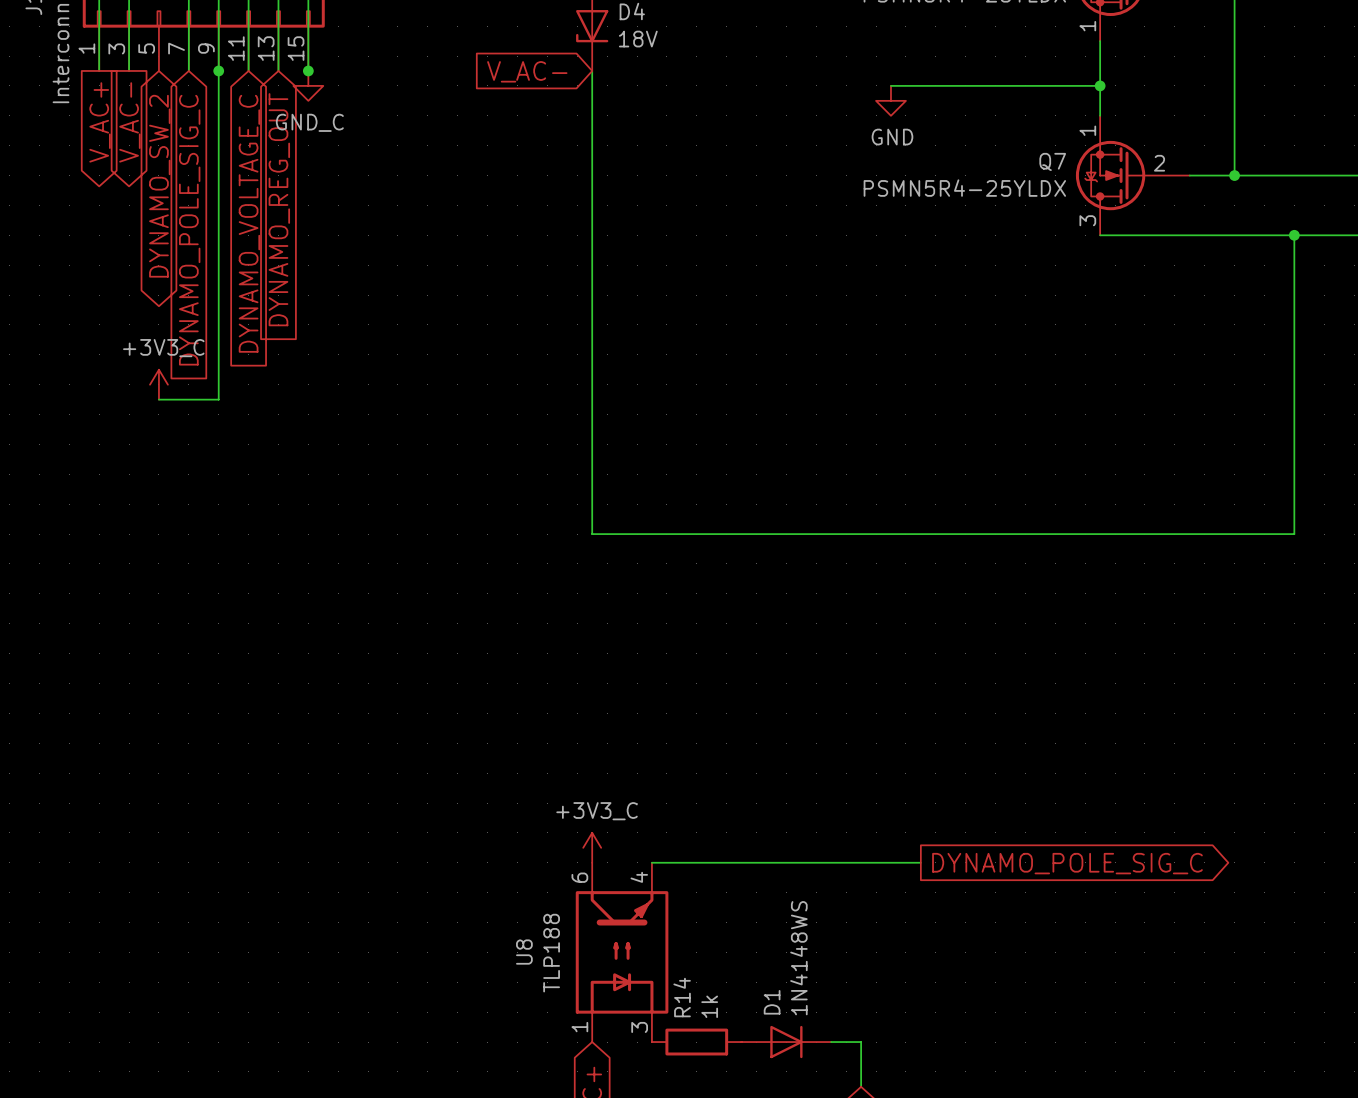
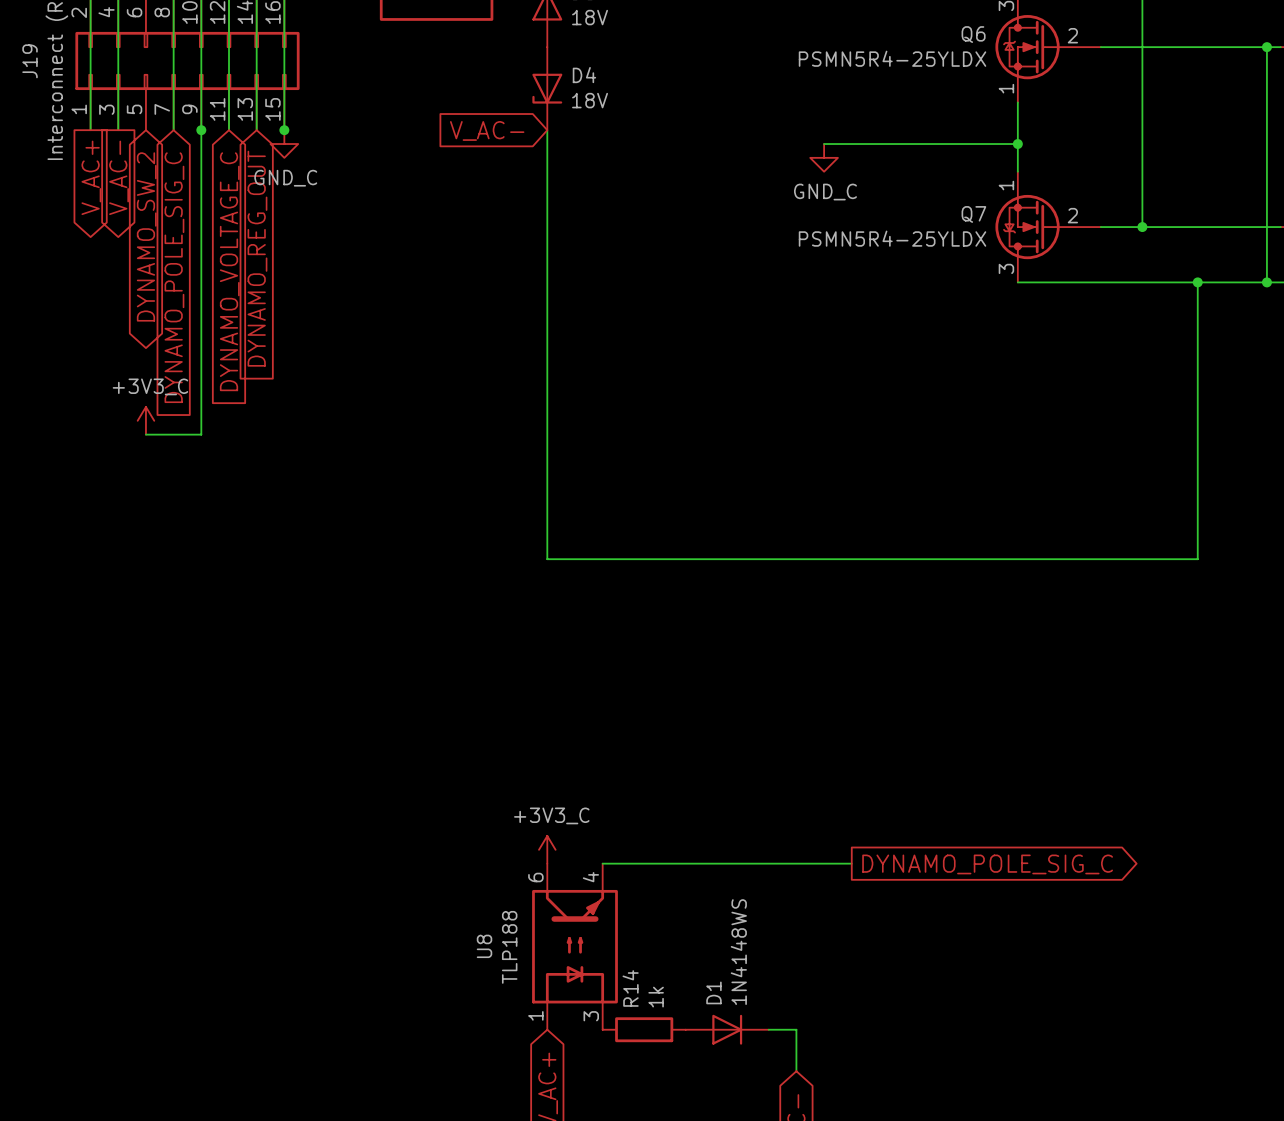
power symbol: GND (890, 100) -> GND_C (824, 157)

